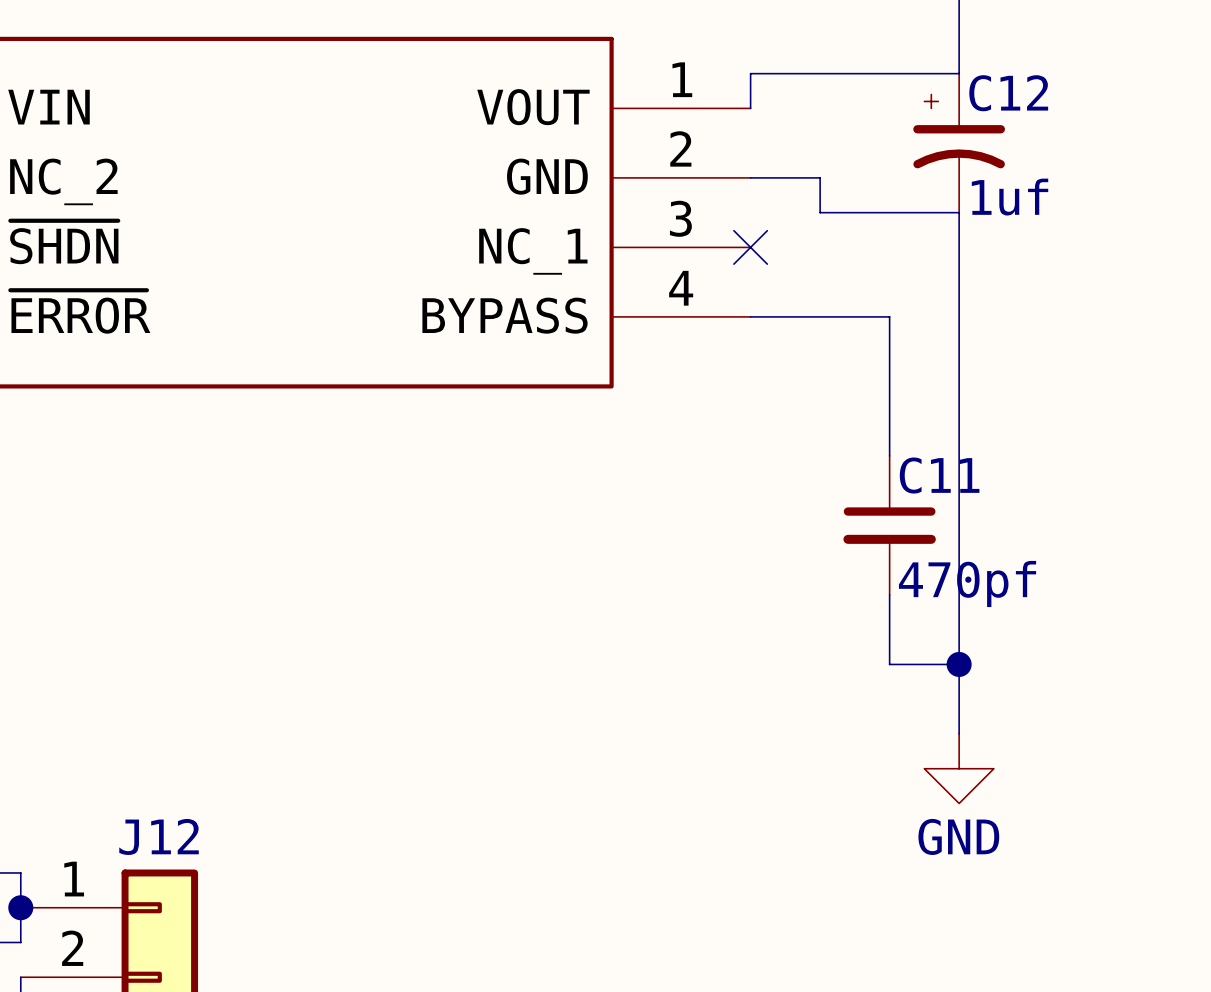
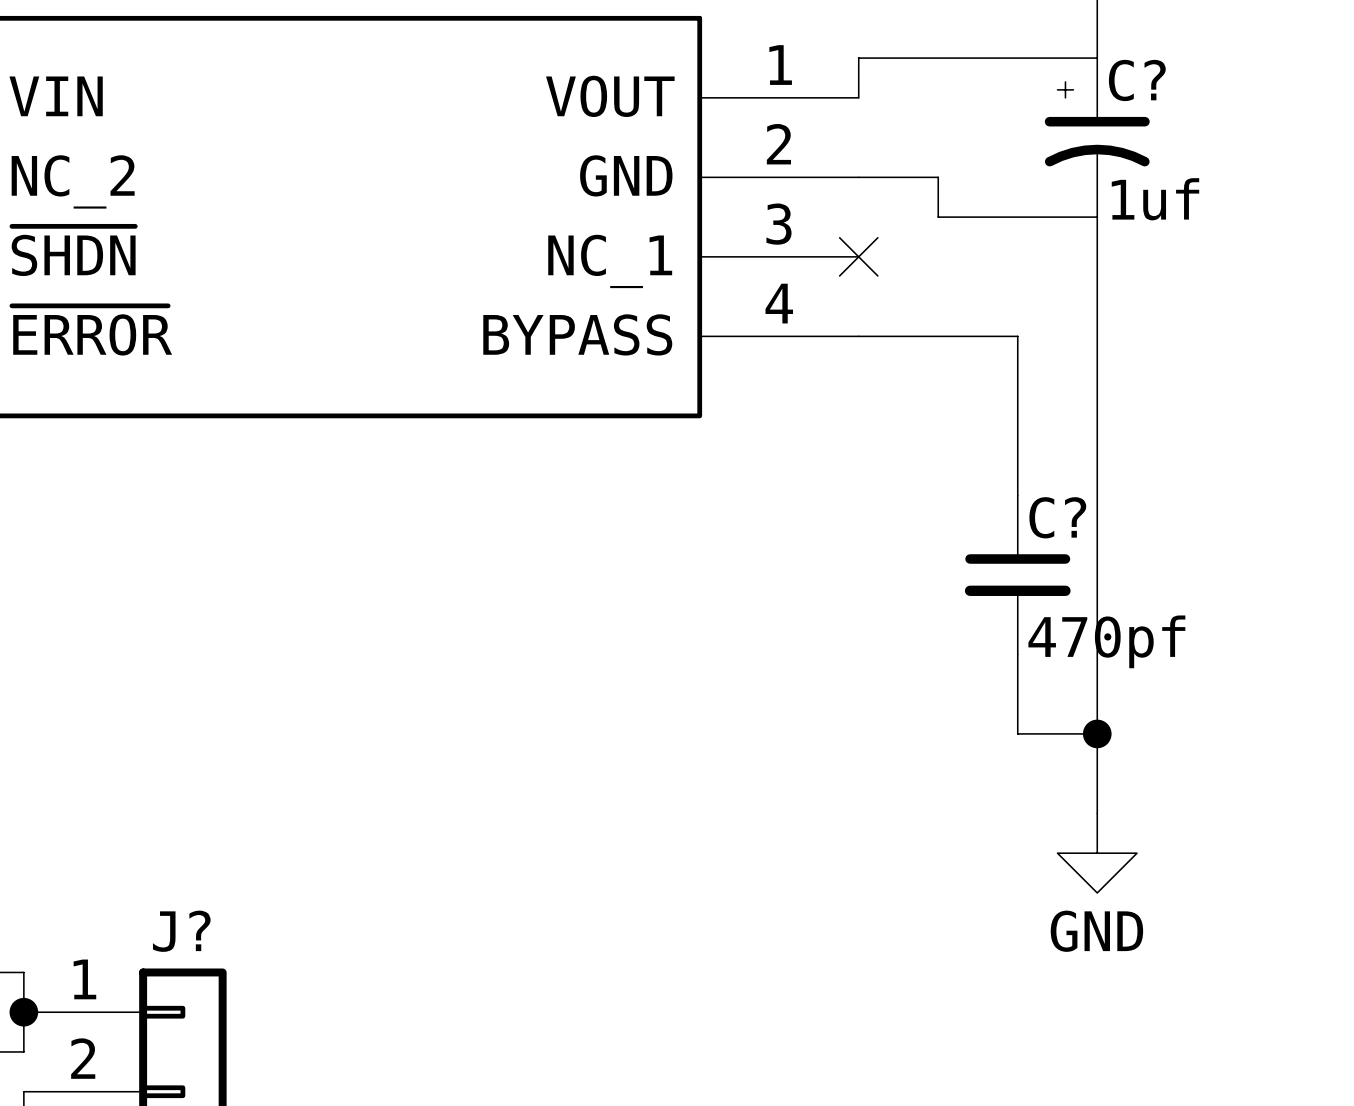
C12 name: C12 (1008, 93) -> C? (1137, 80)
C11 name: C11 (939, 475) -> C? (1057, 517)
J12 name: J12 (159, 836) -> J? (181, 931)

